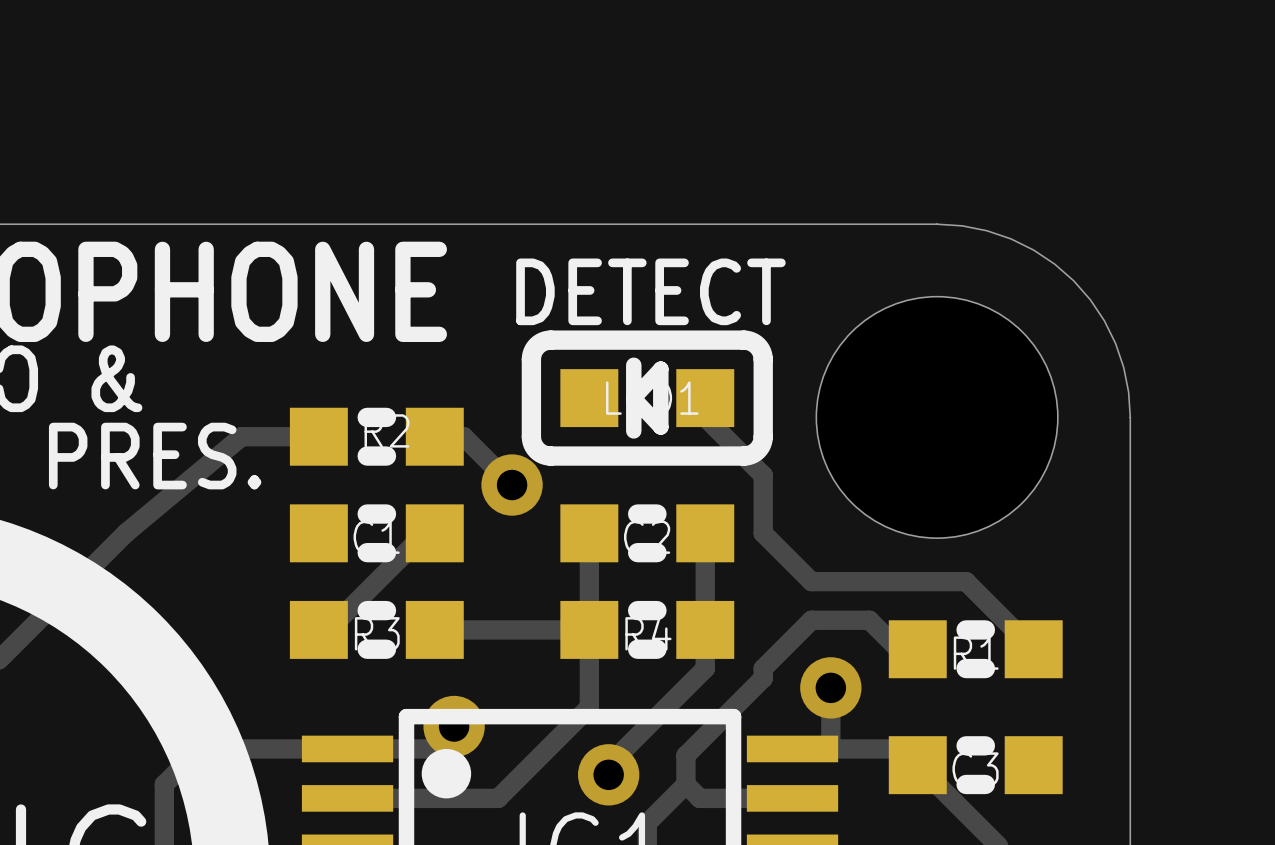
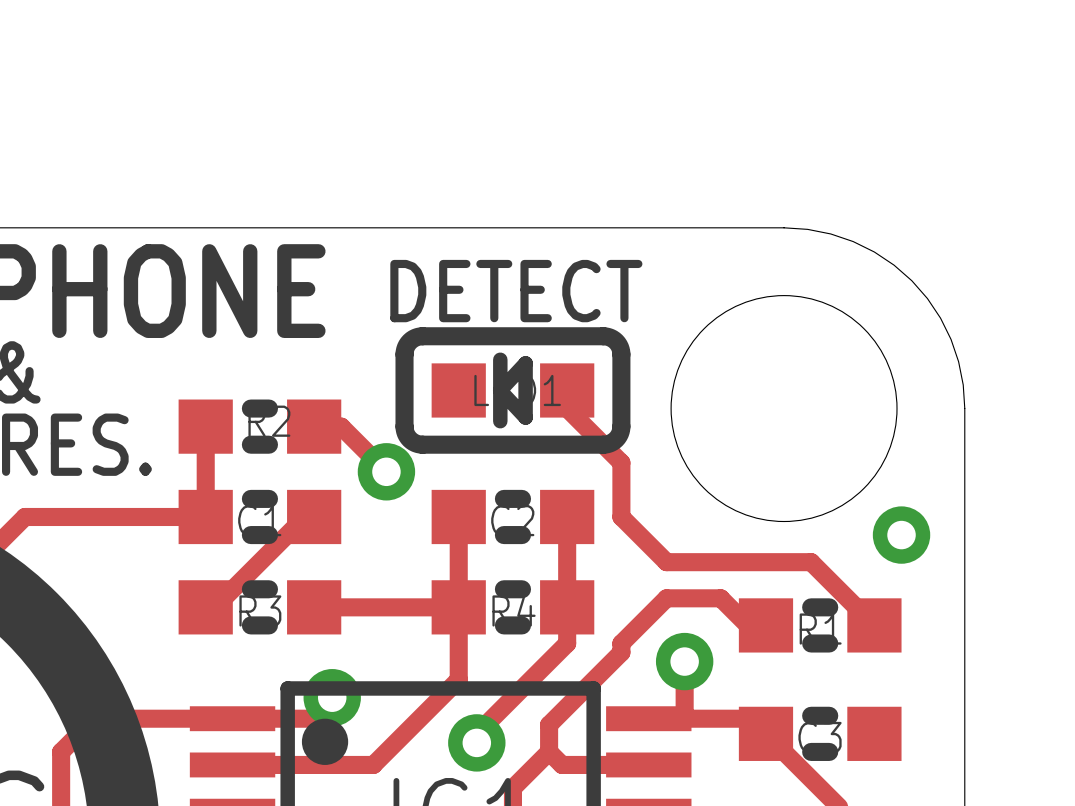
track: (318, 436) (241, 436) (125, 533) -> (205, 426) (205, 516) (24, 516)
via: none -> (901, 535)

